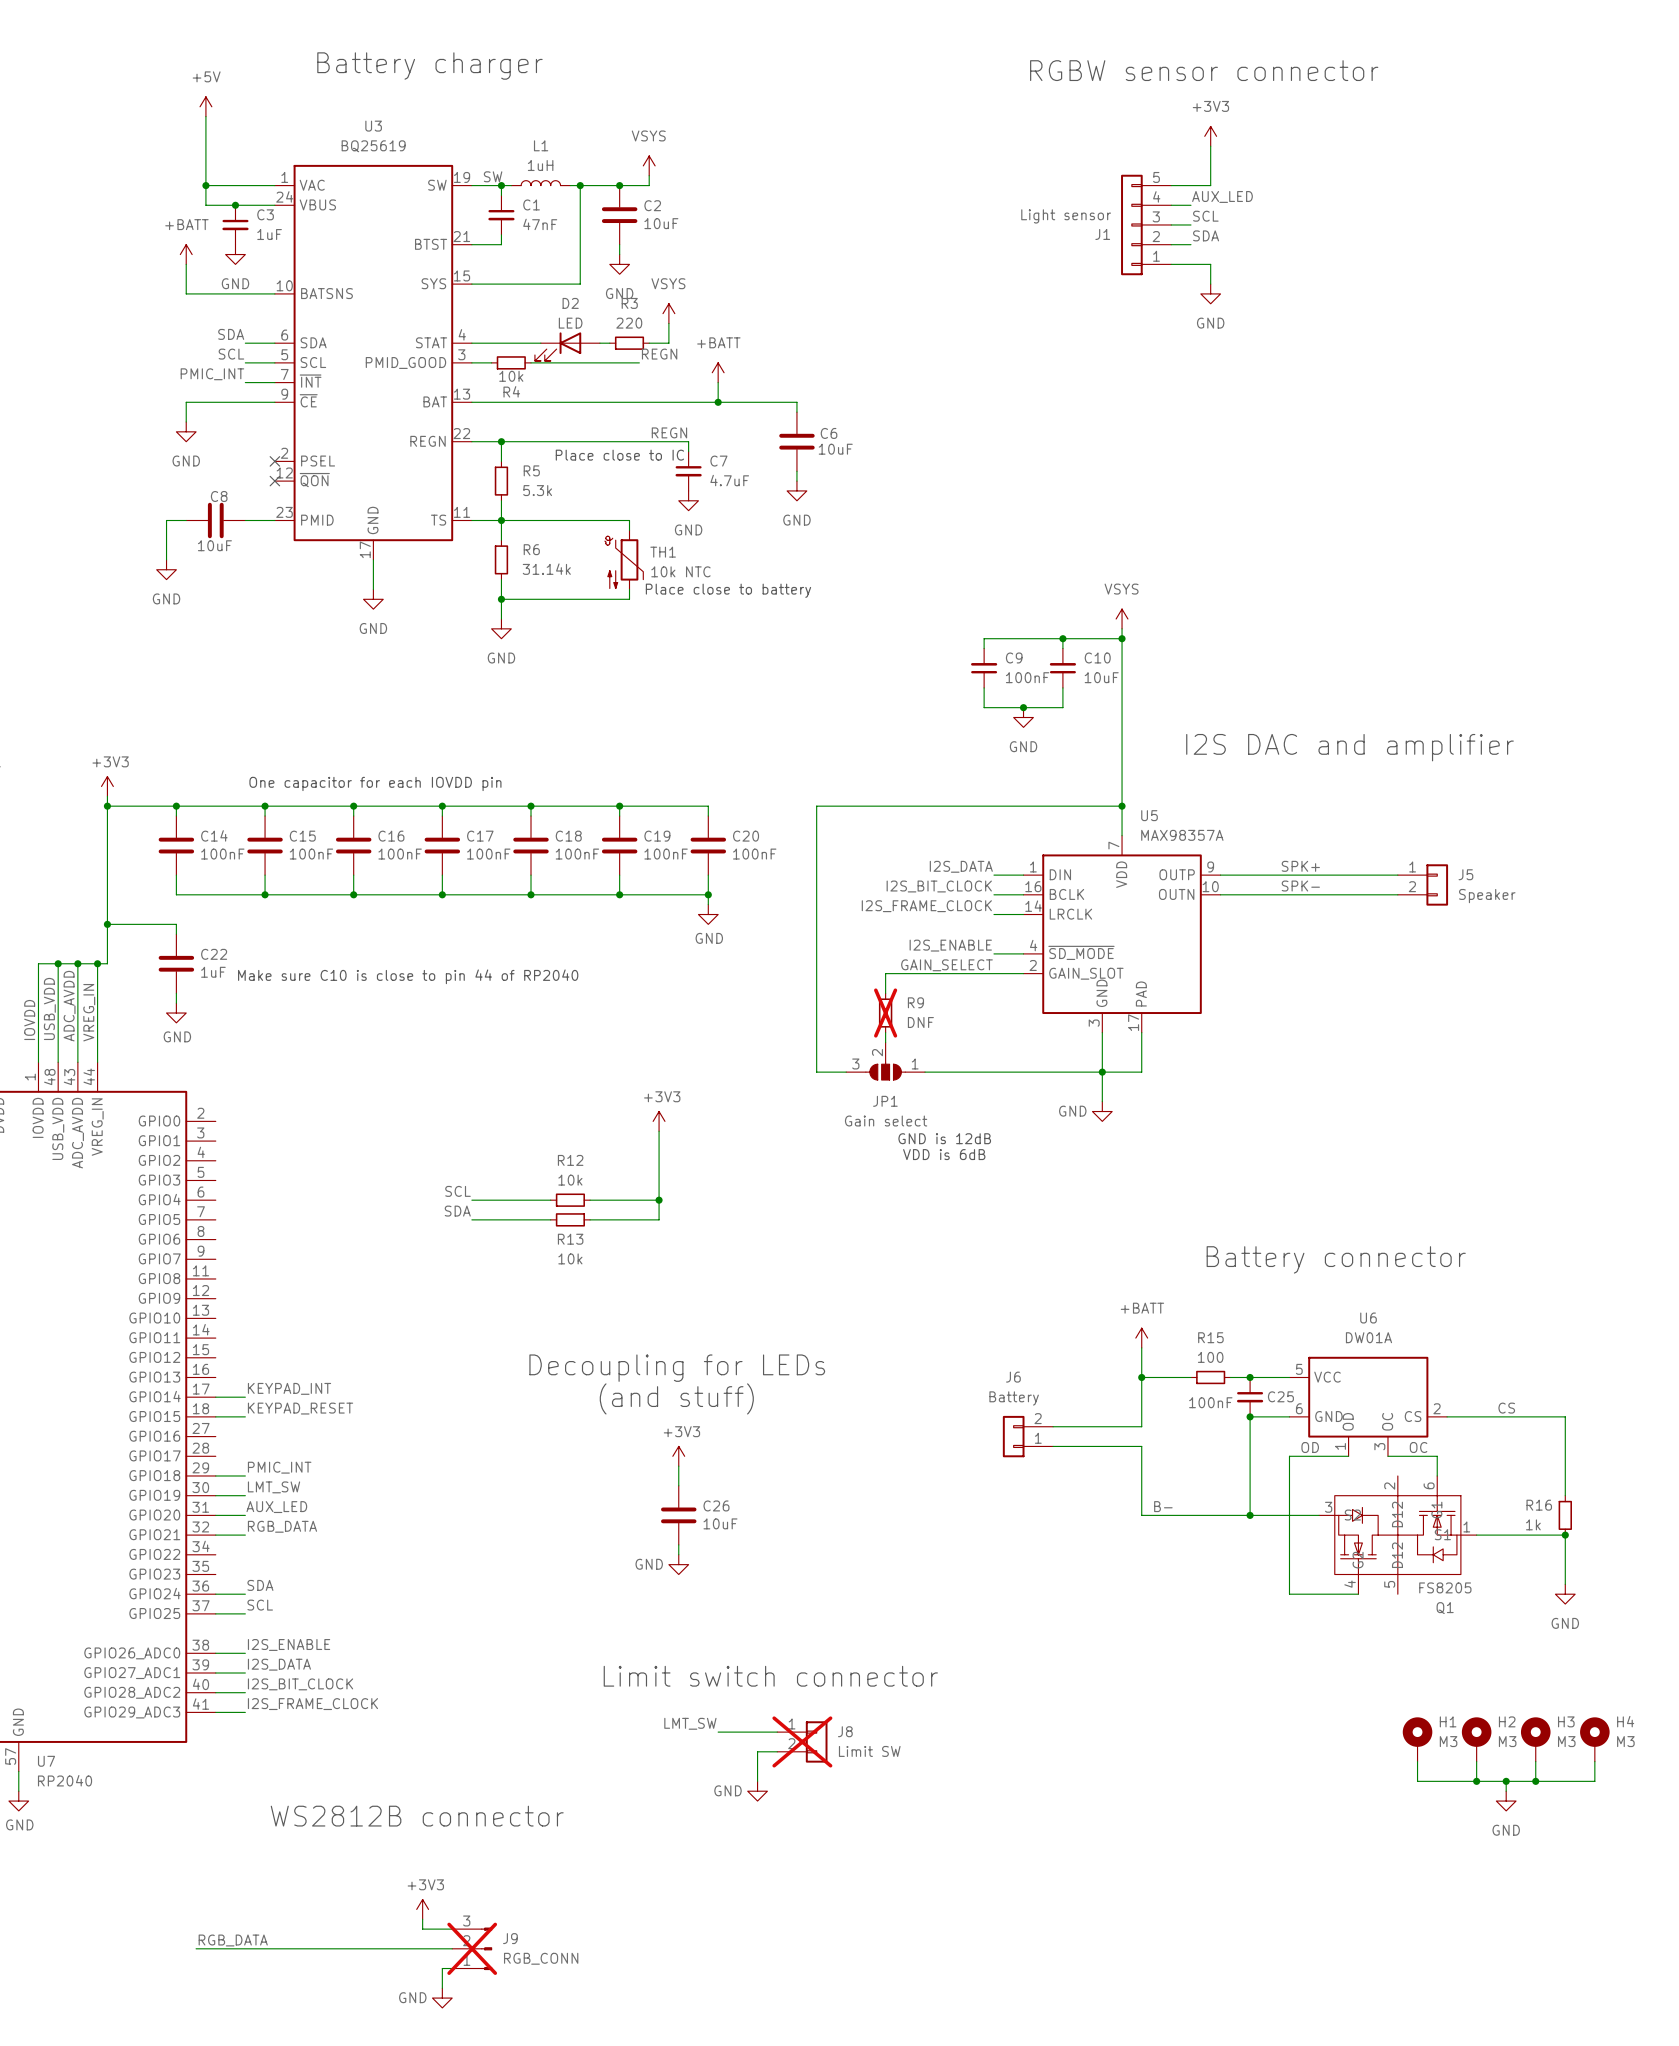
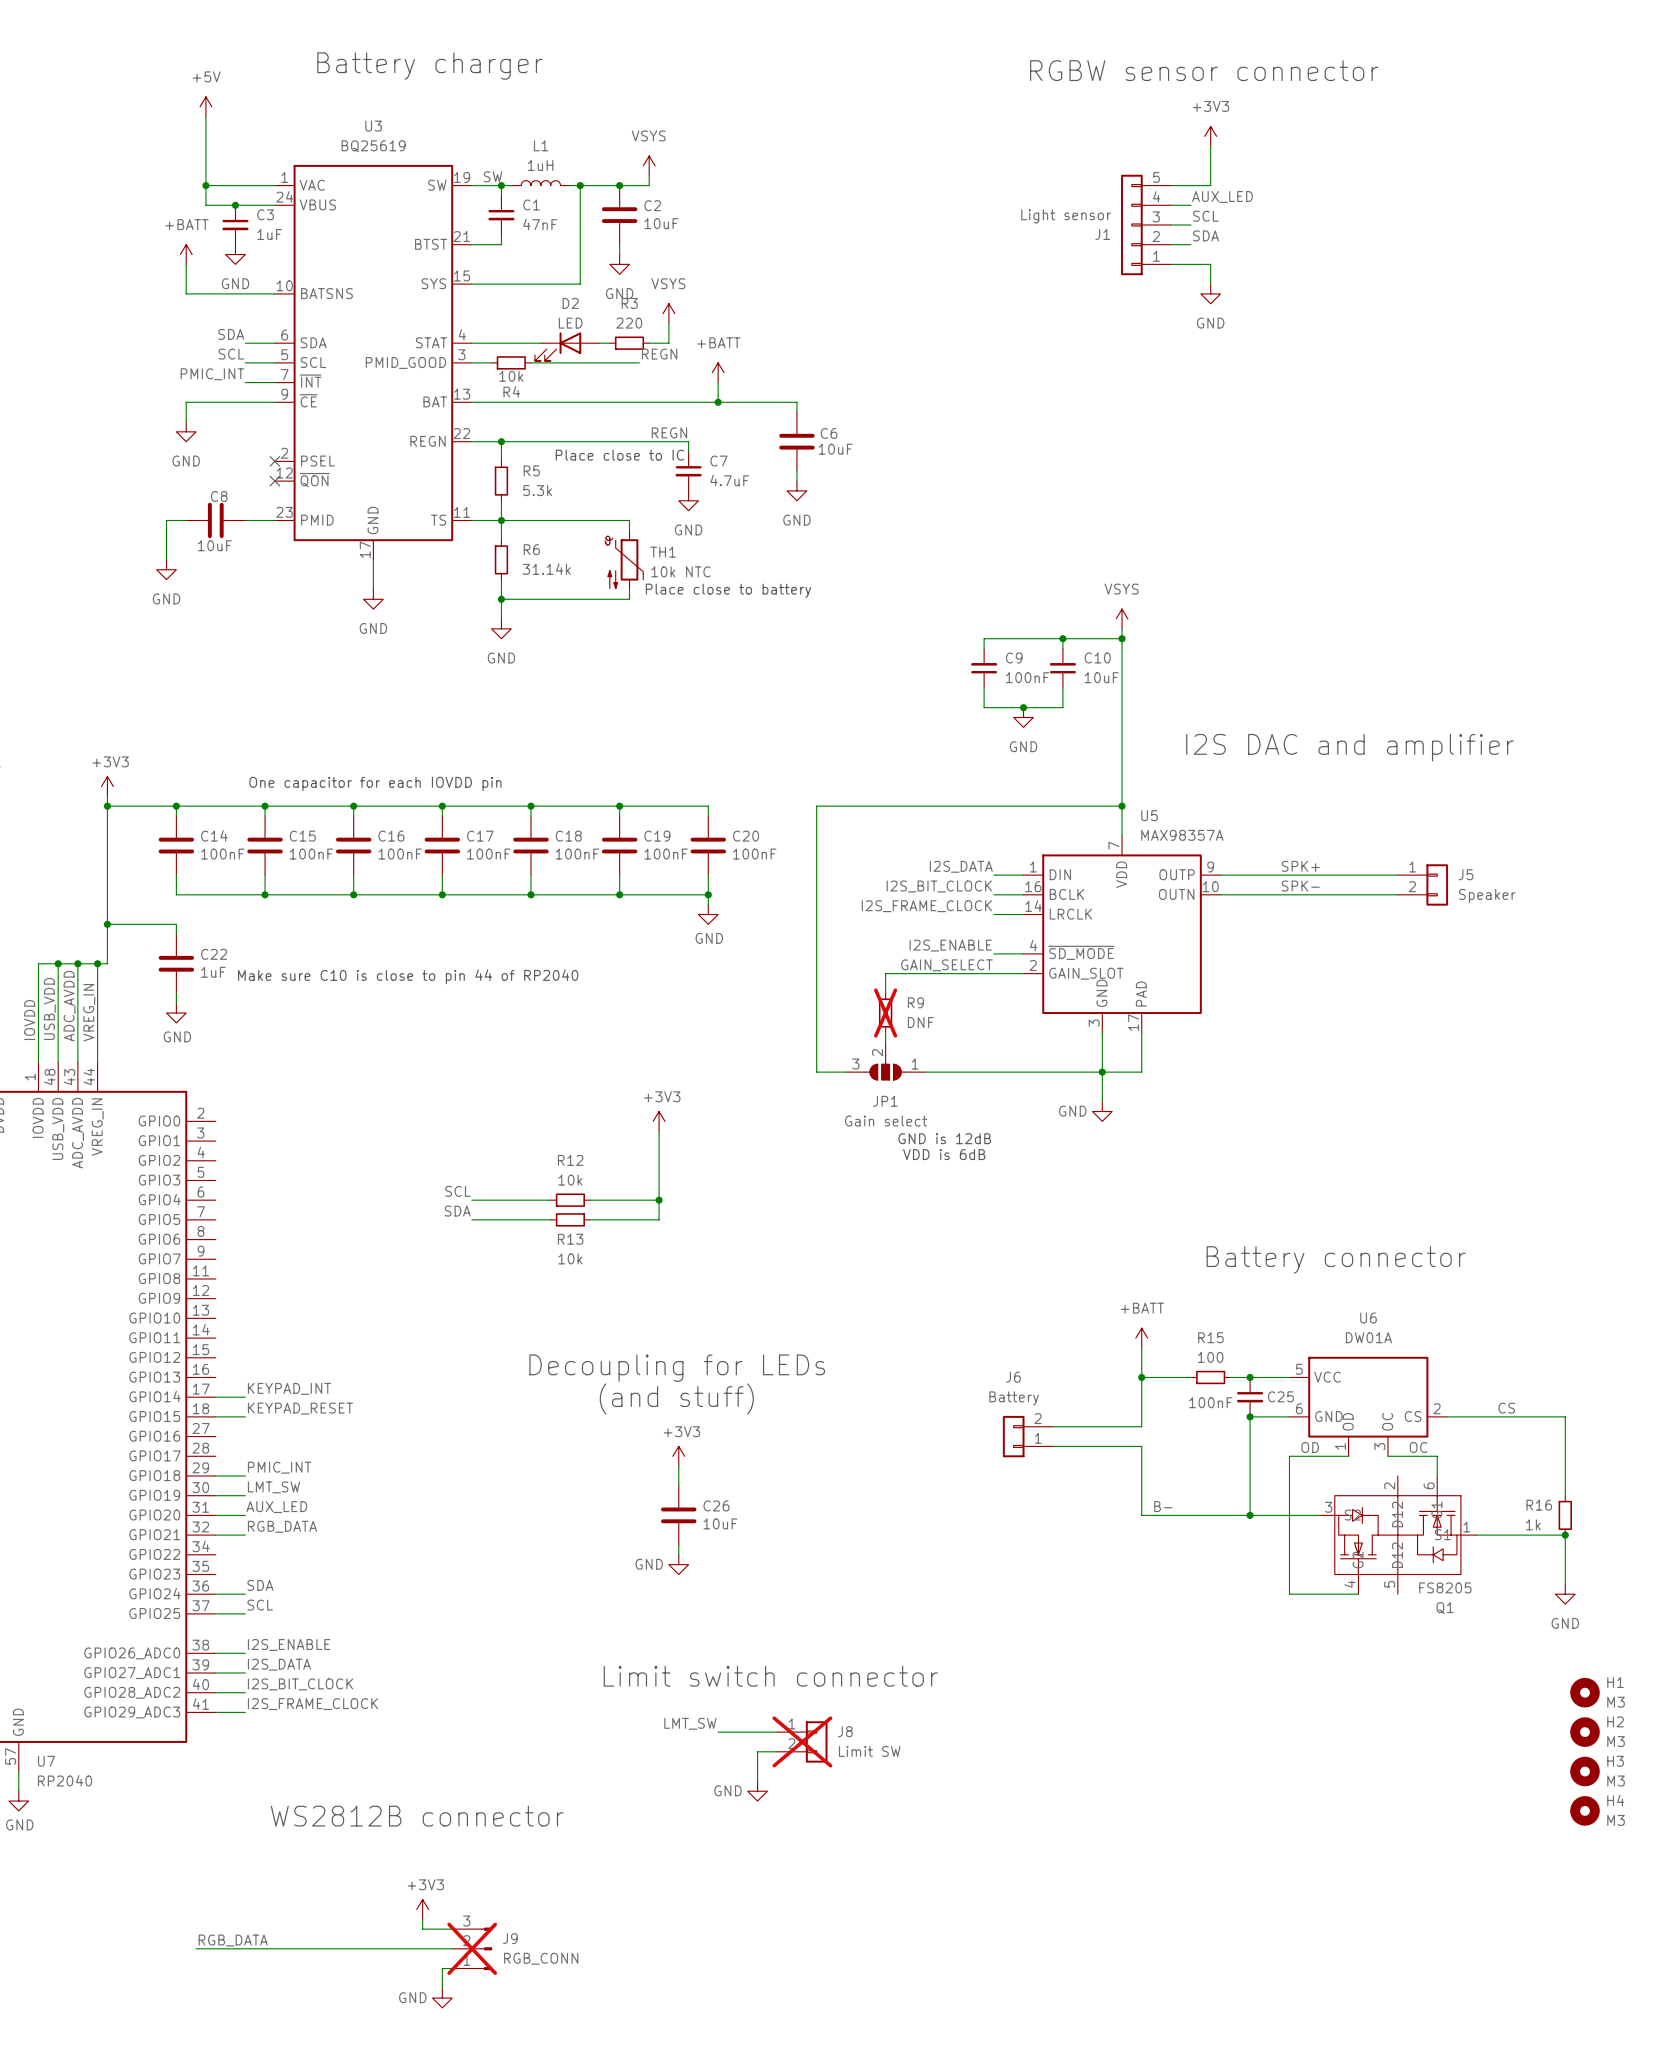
H1 symbol: [1402, 1717, 1433, 1762] -> [1570, 1677, 1600, 1708]
H2 symbol: [1461, 1717, 1492, 1762] -> [1570, 1717, 1600, 1747]
H3 symbol: [1520, 1717, 1551, 1762] -> [1570, 1756, 1600, 1787]
H4 symbol: [1580, 1717, 1610, 1762] -> [1570, 1796, 1600, 1826]
wire: (1417, 1761) (1417, 1781) (1594, 1781) (1594, 1761) -> none
wire: (1476, 1761) (1476, 1781) -> none
wire: (1535, 1761) (1535, 1781) -> none
junction: (1476, 1781) -> none
wire: (1506, 1781) (1506, 1791) -> none
junction: (1506, 1781) -> none
junction: (1535, 1781) -> none
power symbol: GND (1506, 1801) -> none

